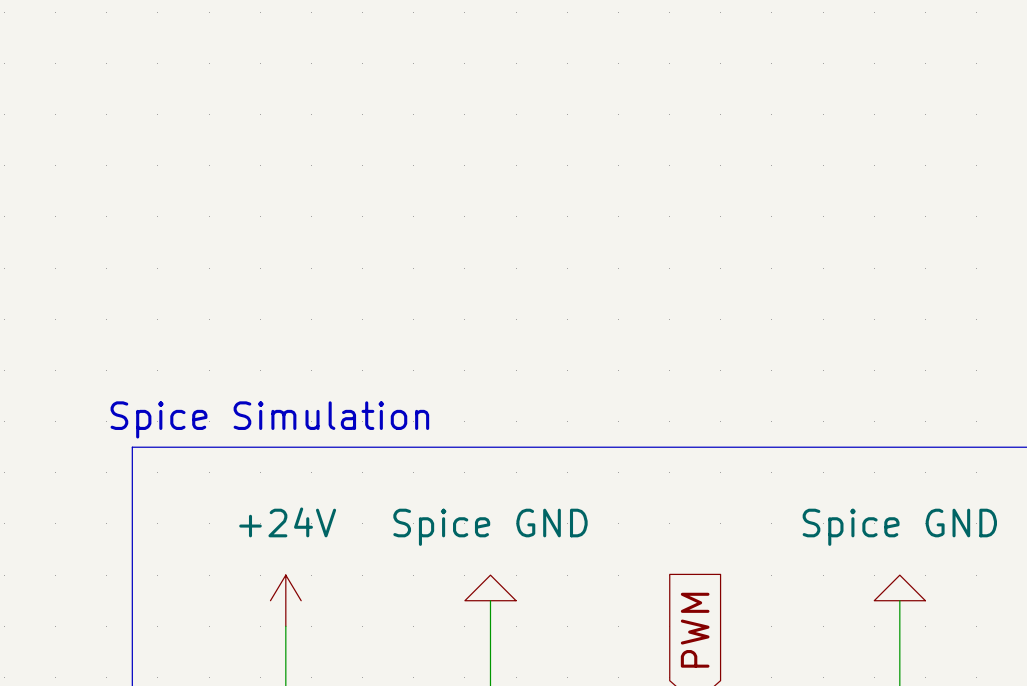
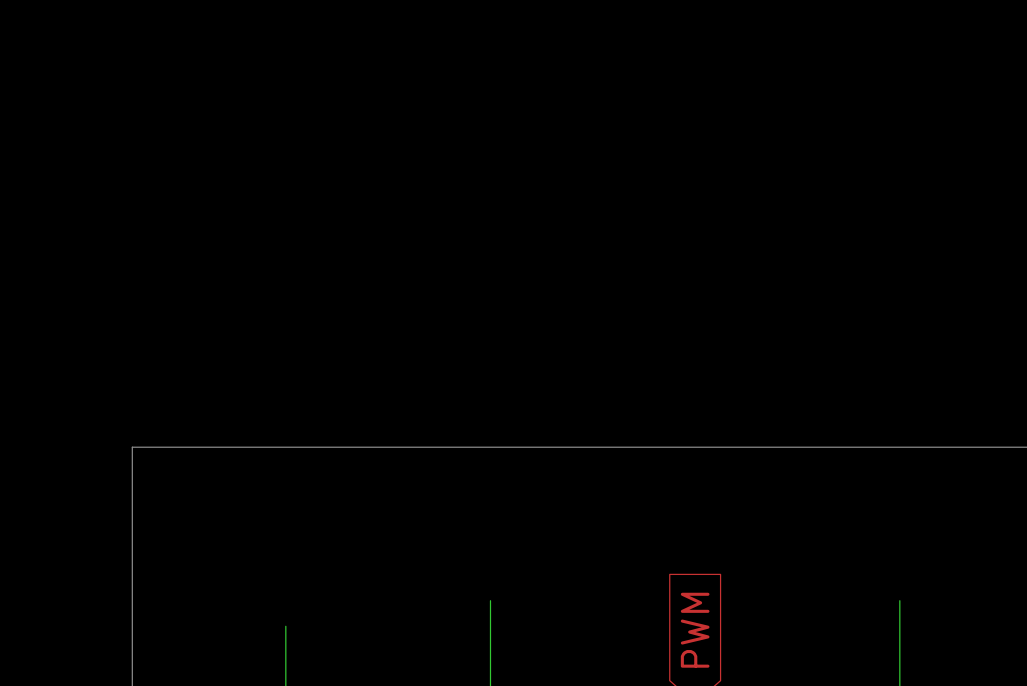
text: Spice Simulation (269, 419) -> none
power symbol: Spice GND (490, 587) -> none
power symbol: Spice GND (899, 587) -> none
power symbol: +24V (285, 600) -> none

